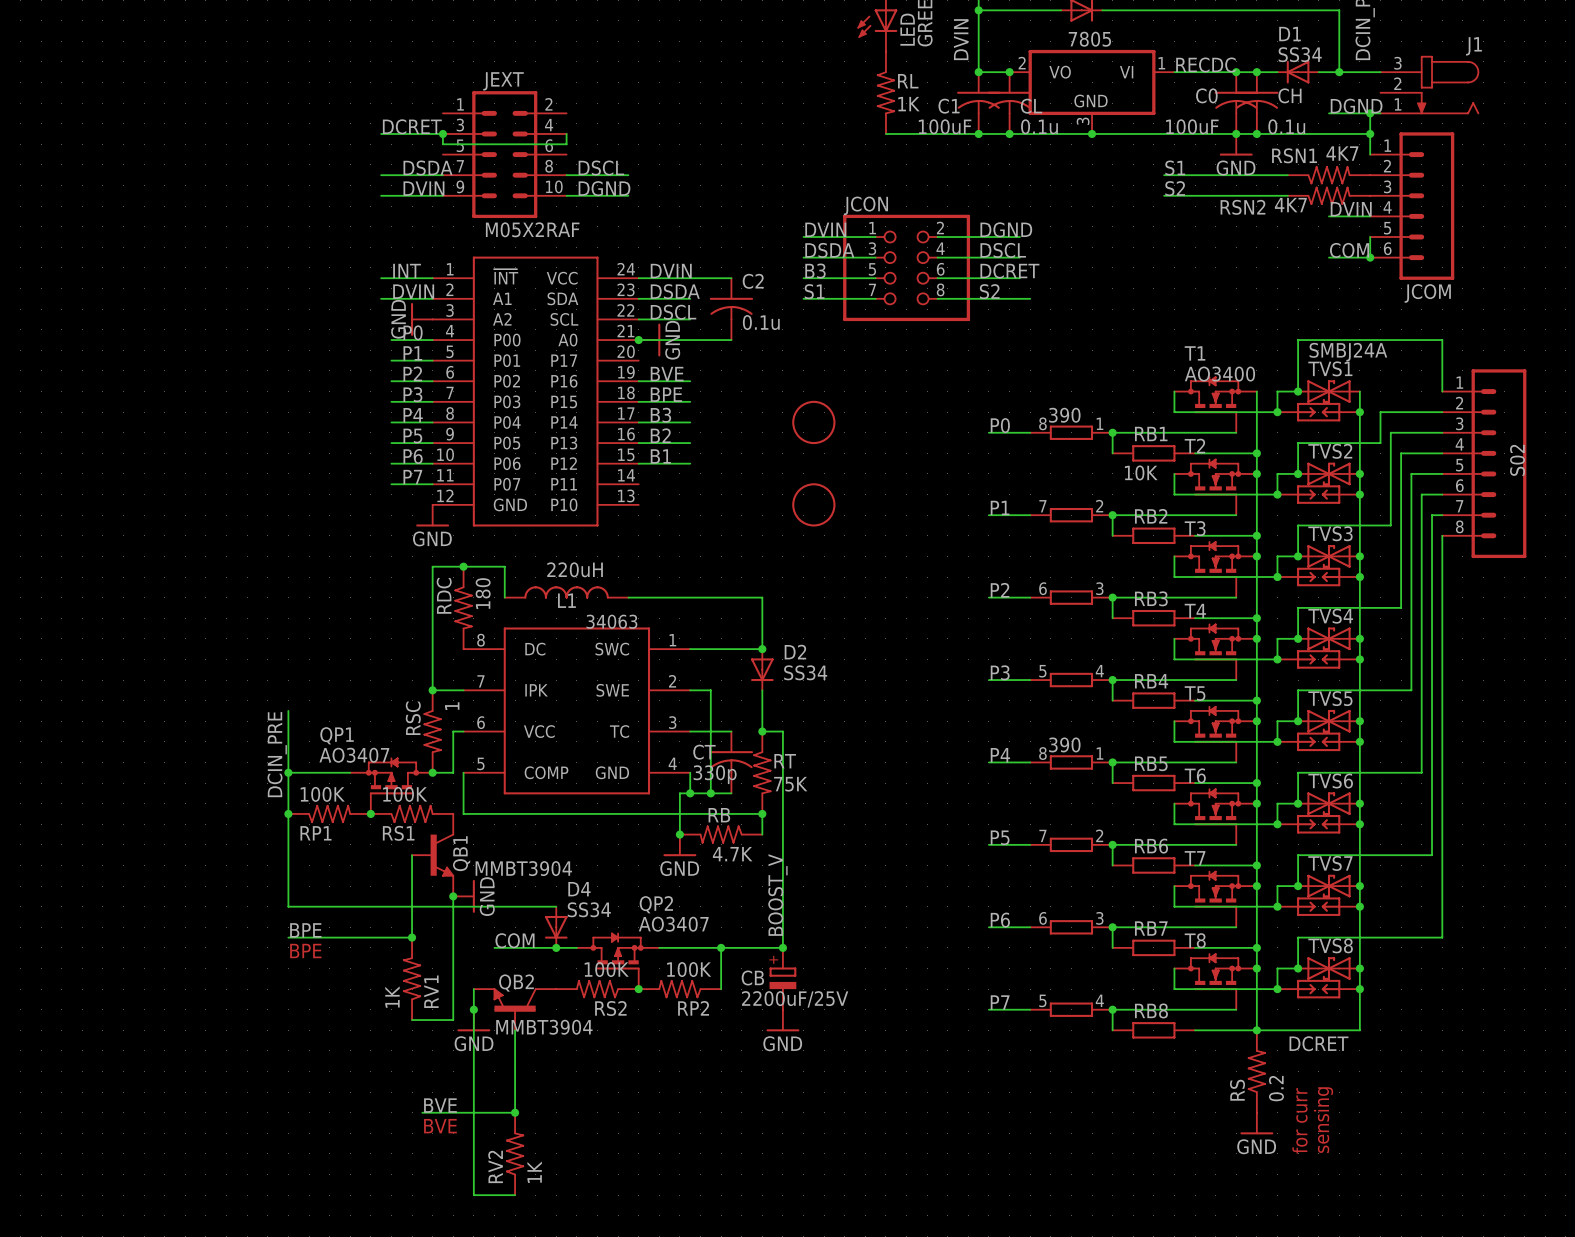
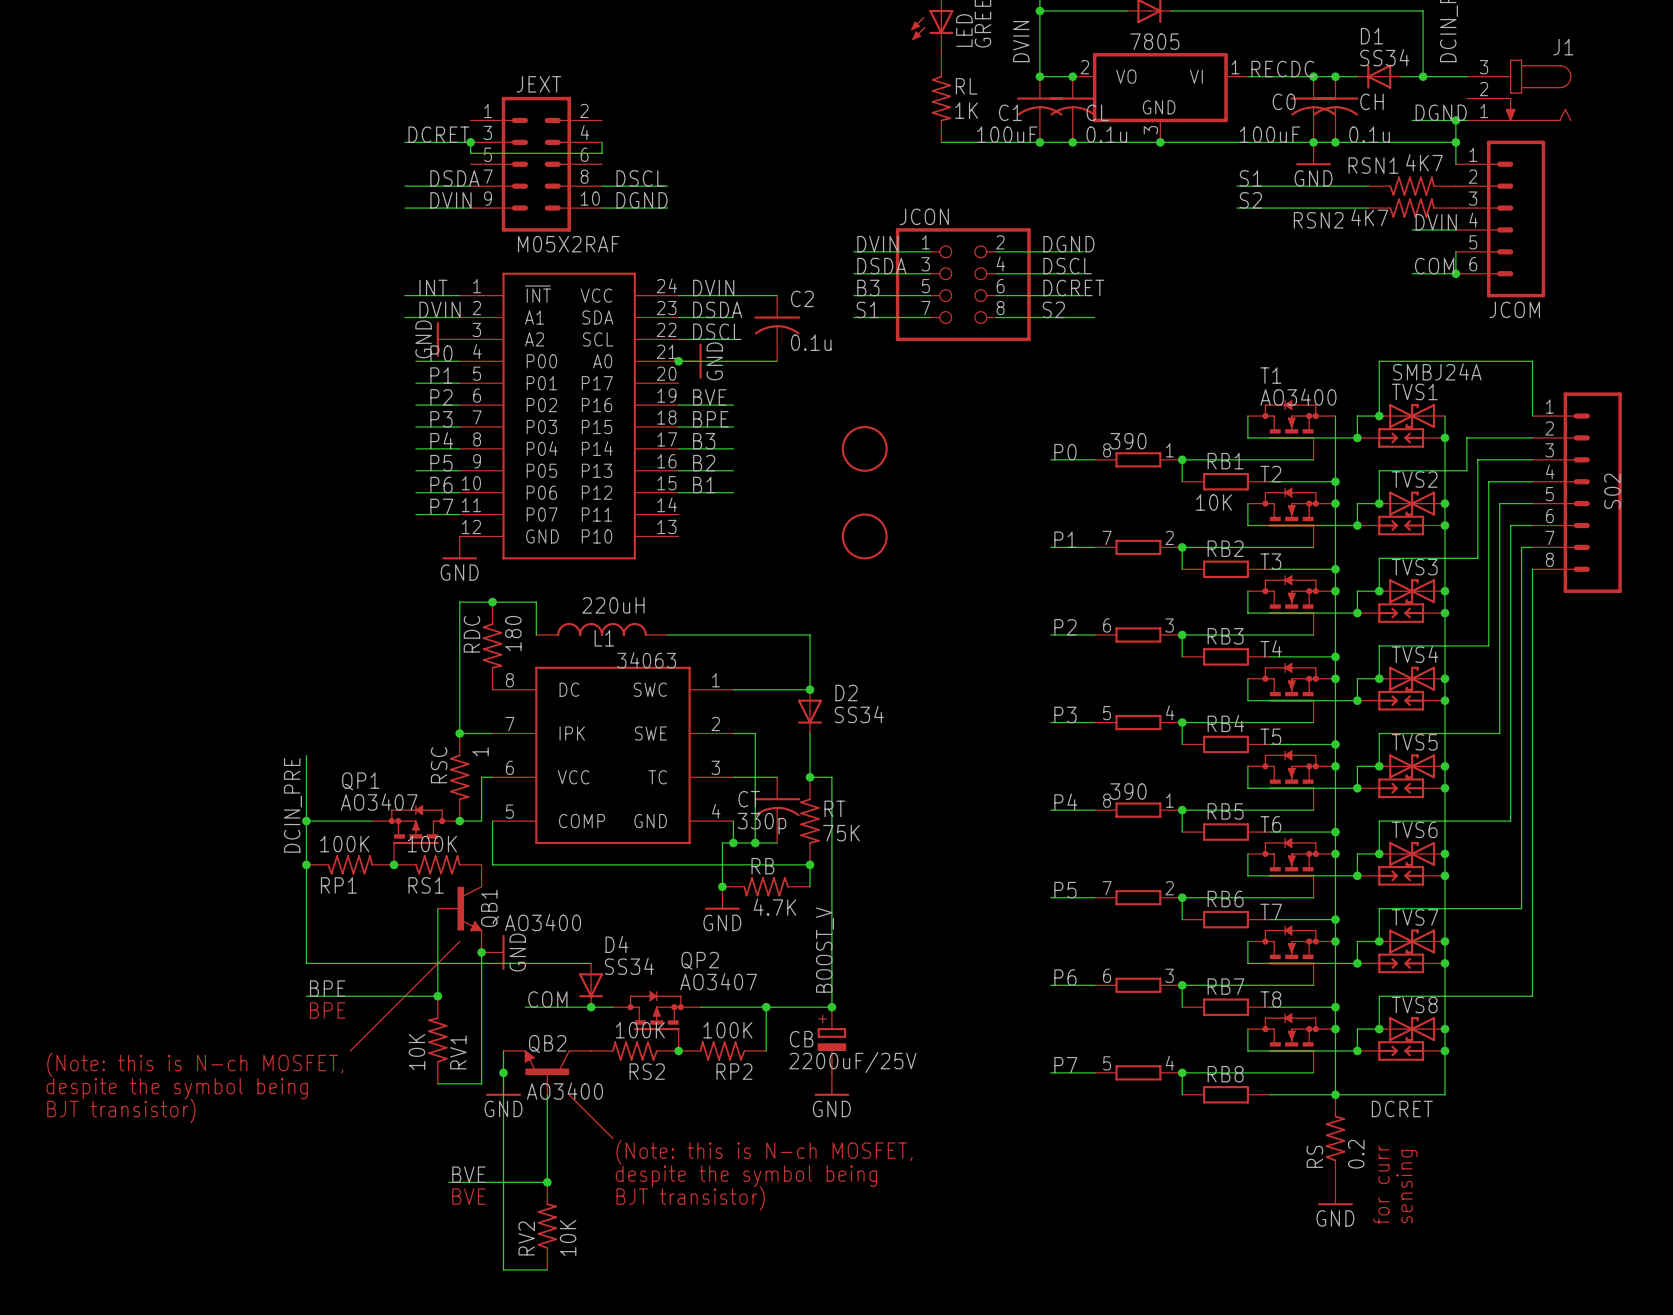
QB1 value: MMBT3904 (523, 868) -> AO3400 (543, 922)
line: none -> (459, 941) (350, 1050)
RV1 value: 1K (392, 997) -> 10K (417, 1052)
text: none -> (Note: this is N-ch MOSFET, (195, 1064)
text: none -> despite the symbol being (177, 1088)
QB2 value: MMBT3904 (544, 1027) -> AO3400 (564, 1091)
line: none -> (569, 1094) (612, 1138)
text: none -> BJT transistor) (121, 1110)
text: none -> (Note: this is N-ch MOSFET, (764, 1152)
text: none -> despite the symbol being (746, 1176)
text: none -> BJT transistor) (690, 1198)
RV2 value: 1K (534, 1172) -> 10K (568, 1238)

